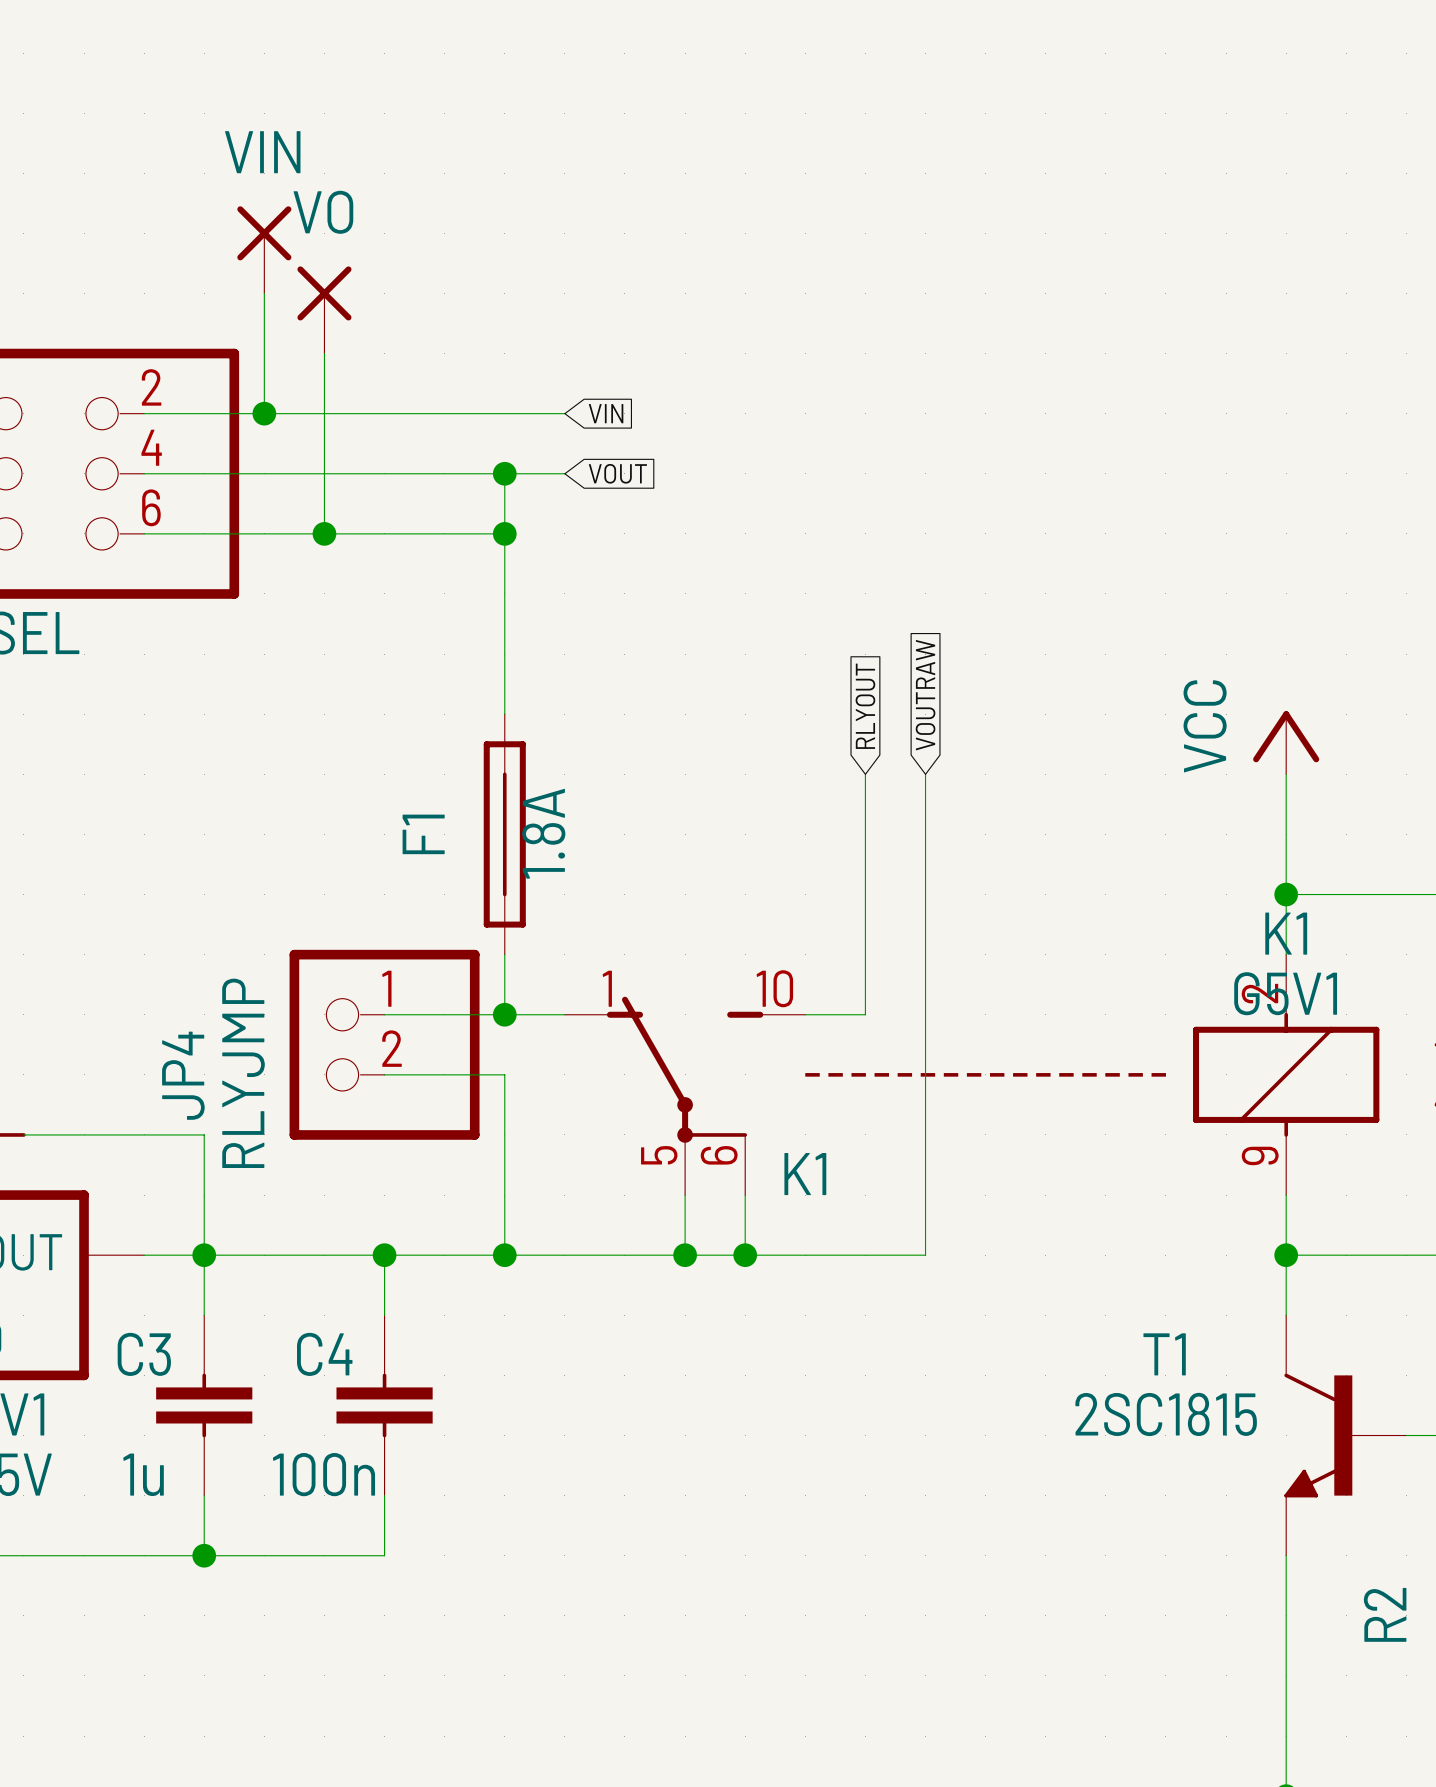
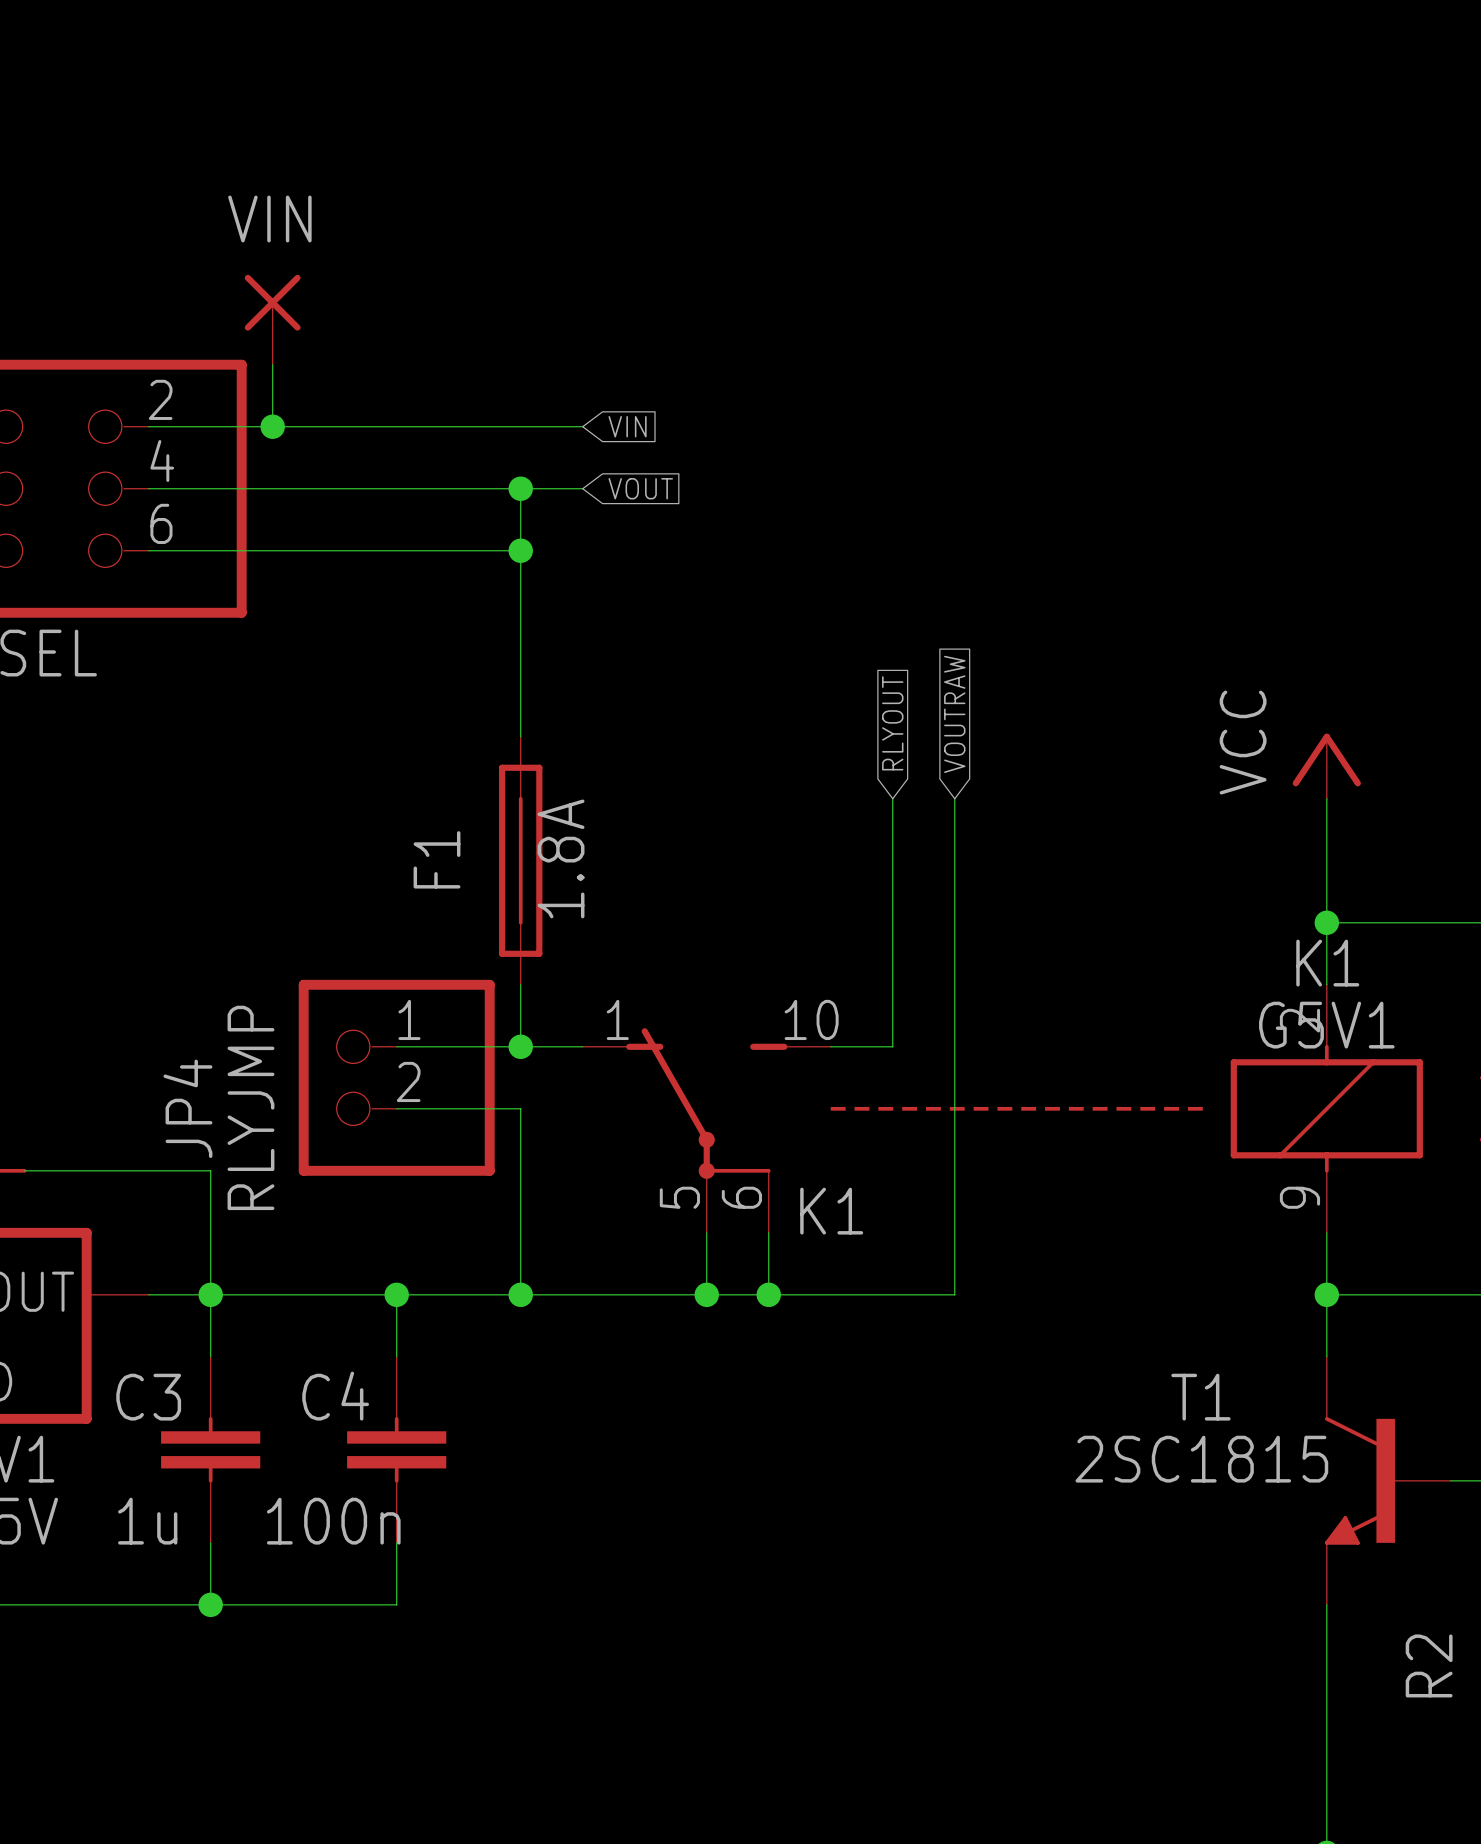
VIN position: (264, 249) -> (272, 319)
VO: (324, 309) -> none
wire: (324, 353) (324, 533) -> none
junction: (324, 533) -> none

